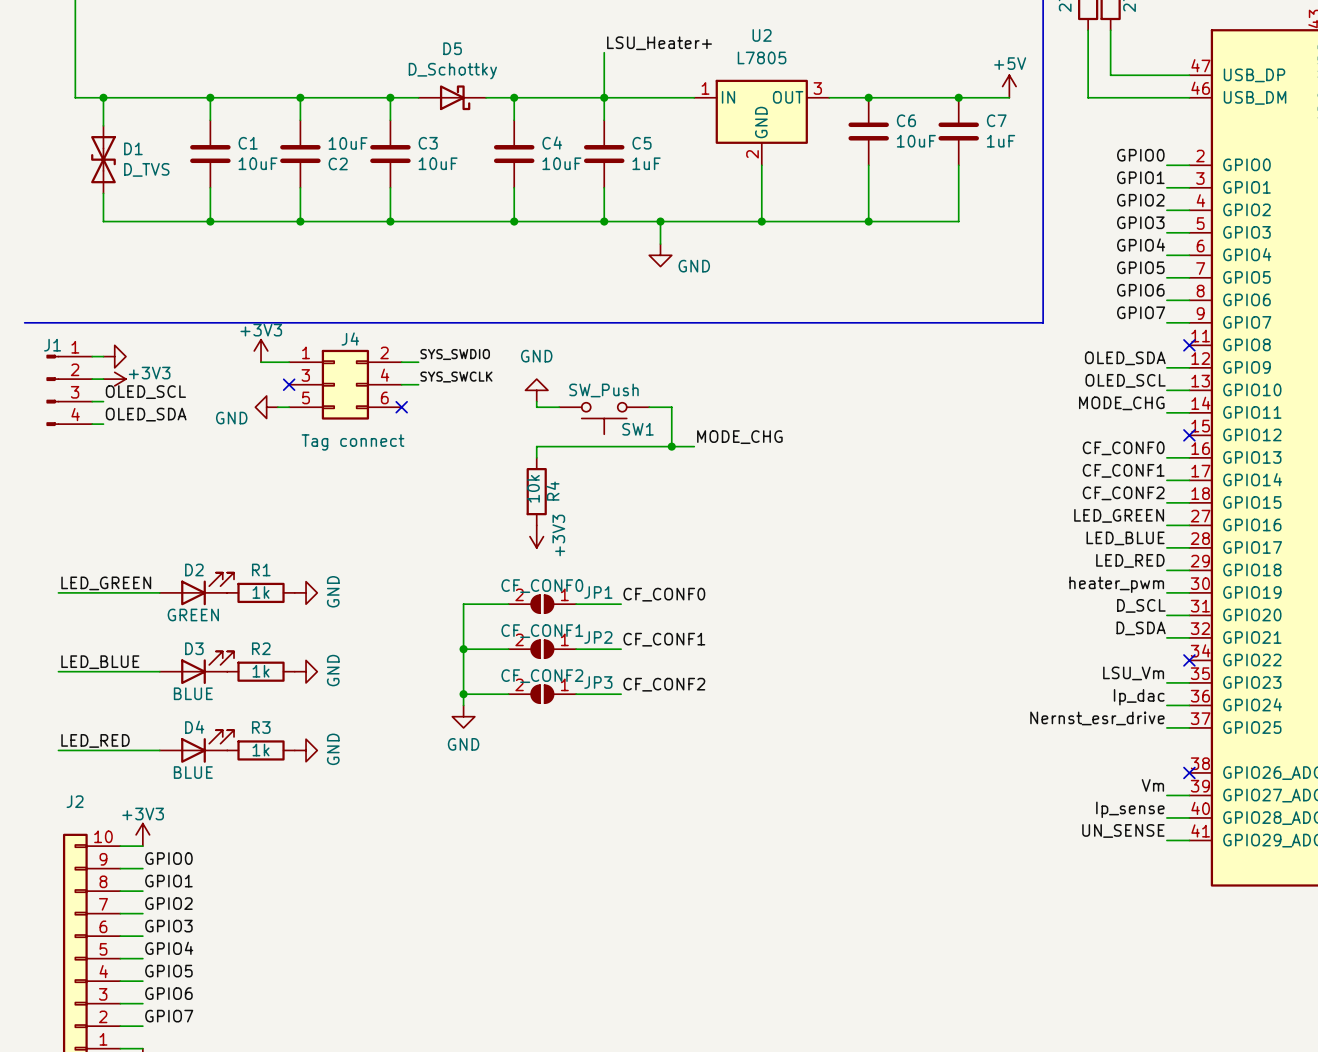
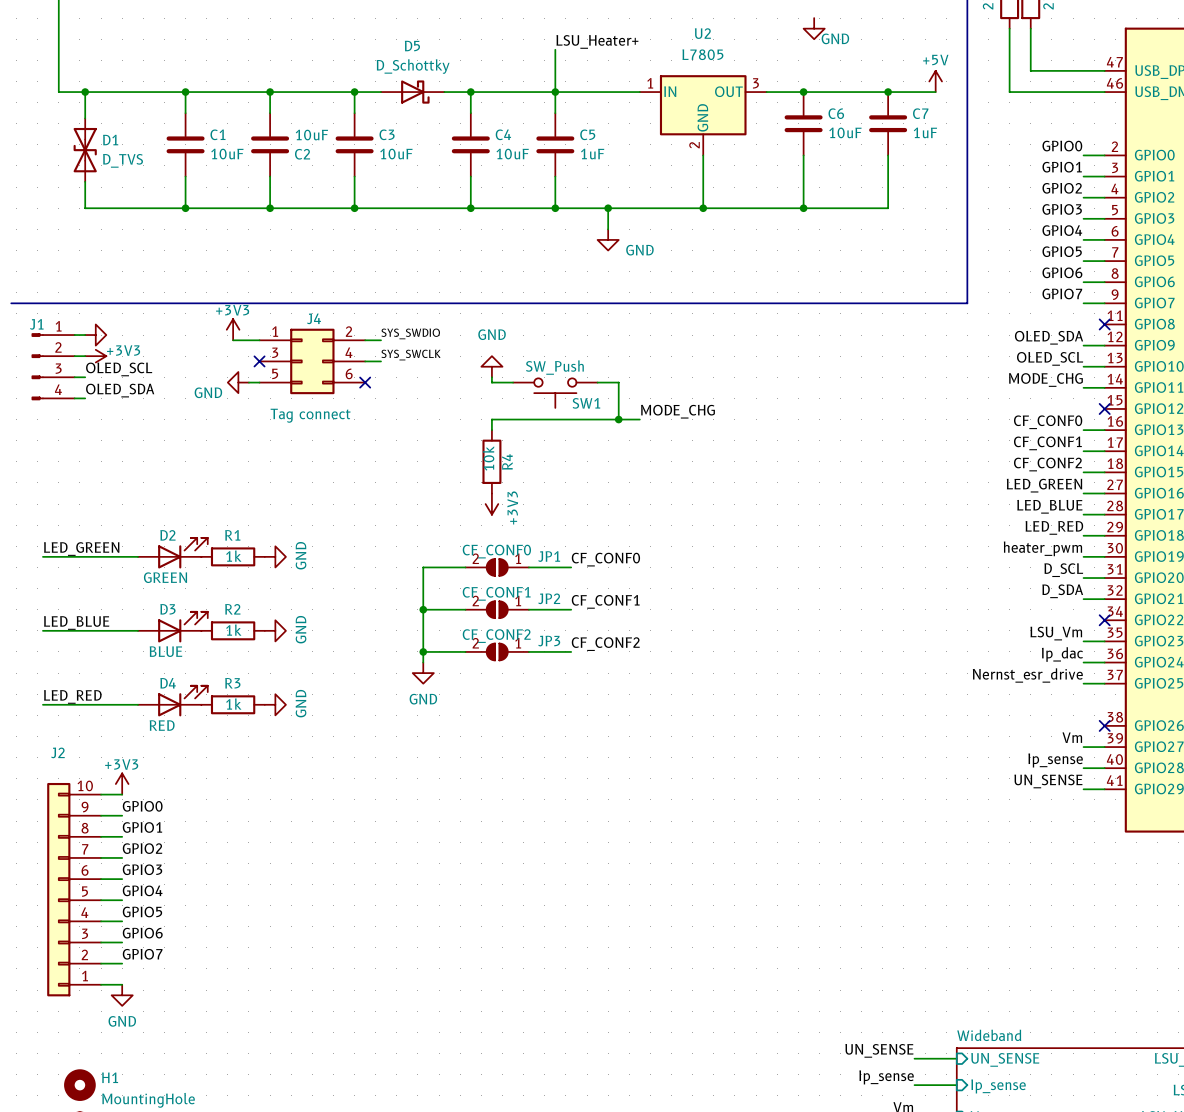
power symbol: none -> GND (814, 28)
D4 value: BLUE (193, 772) -> RED (162, 725)

